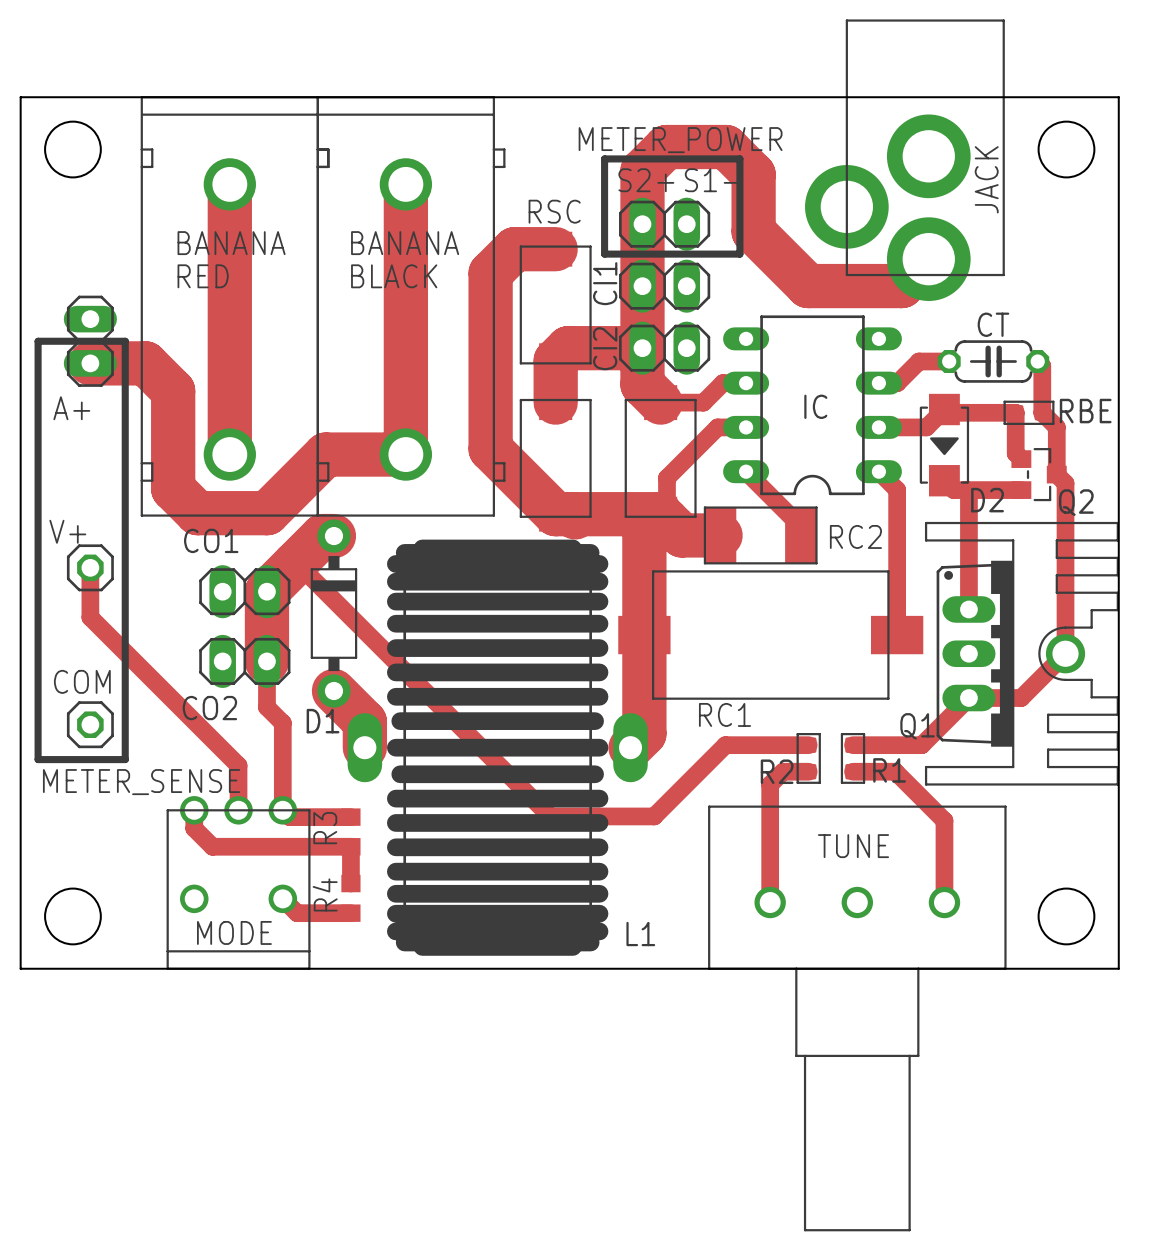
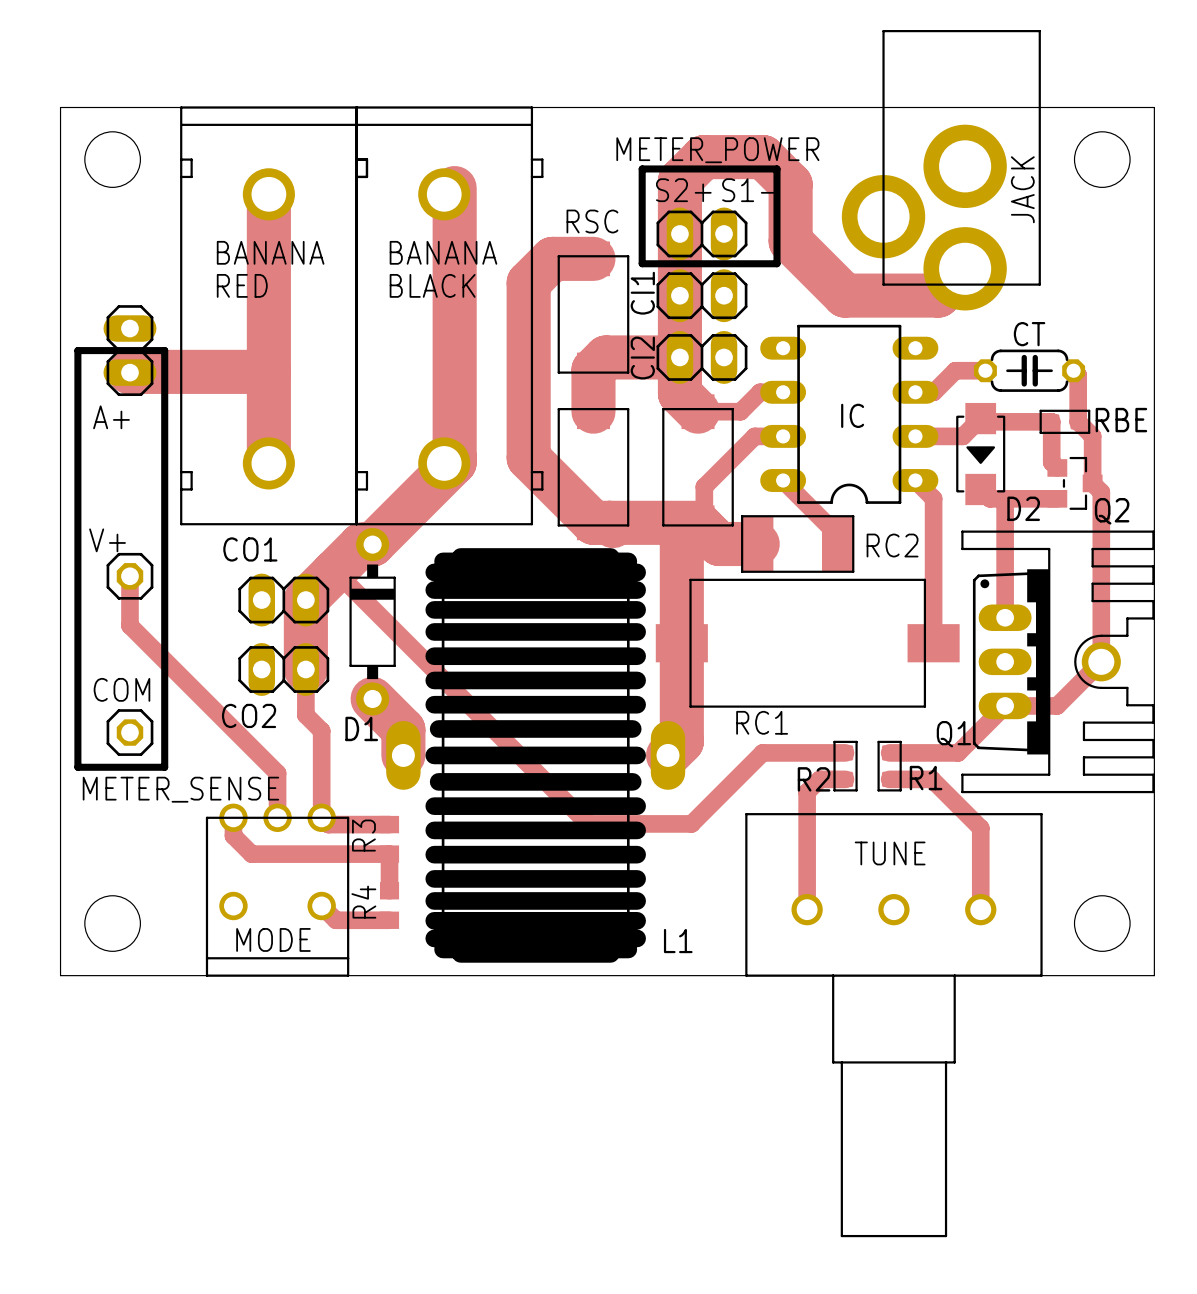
track: none -> (454, 188) (454, 462) (372, 544)
track: (405, 184) (405, 454) (325, 454) (267, 513) (197, 513) (173, 488) (173, 390) (145, 363) (90, 363) -> (268, 371) (129, 372)

